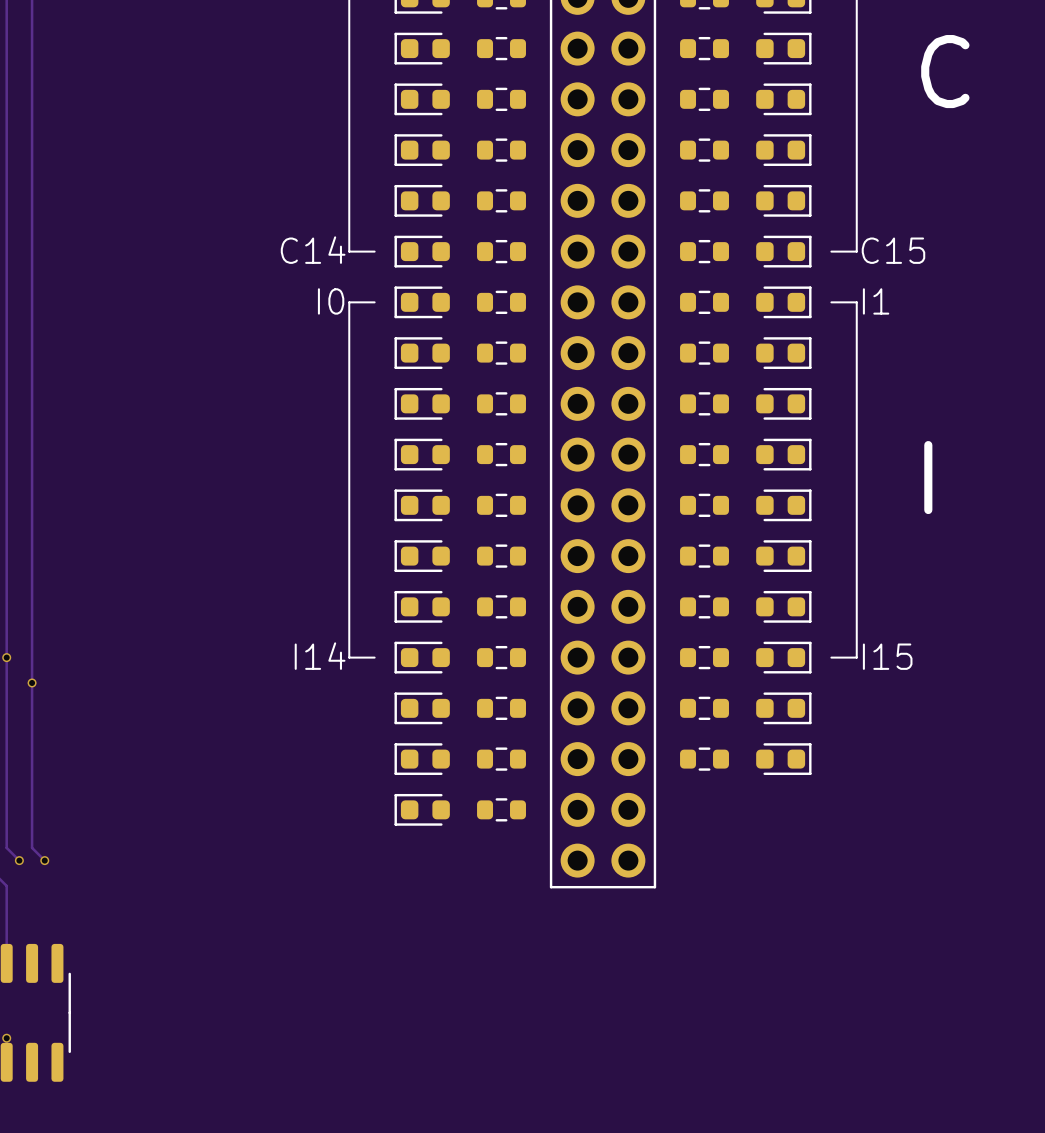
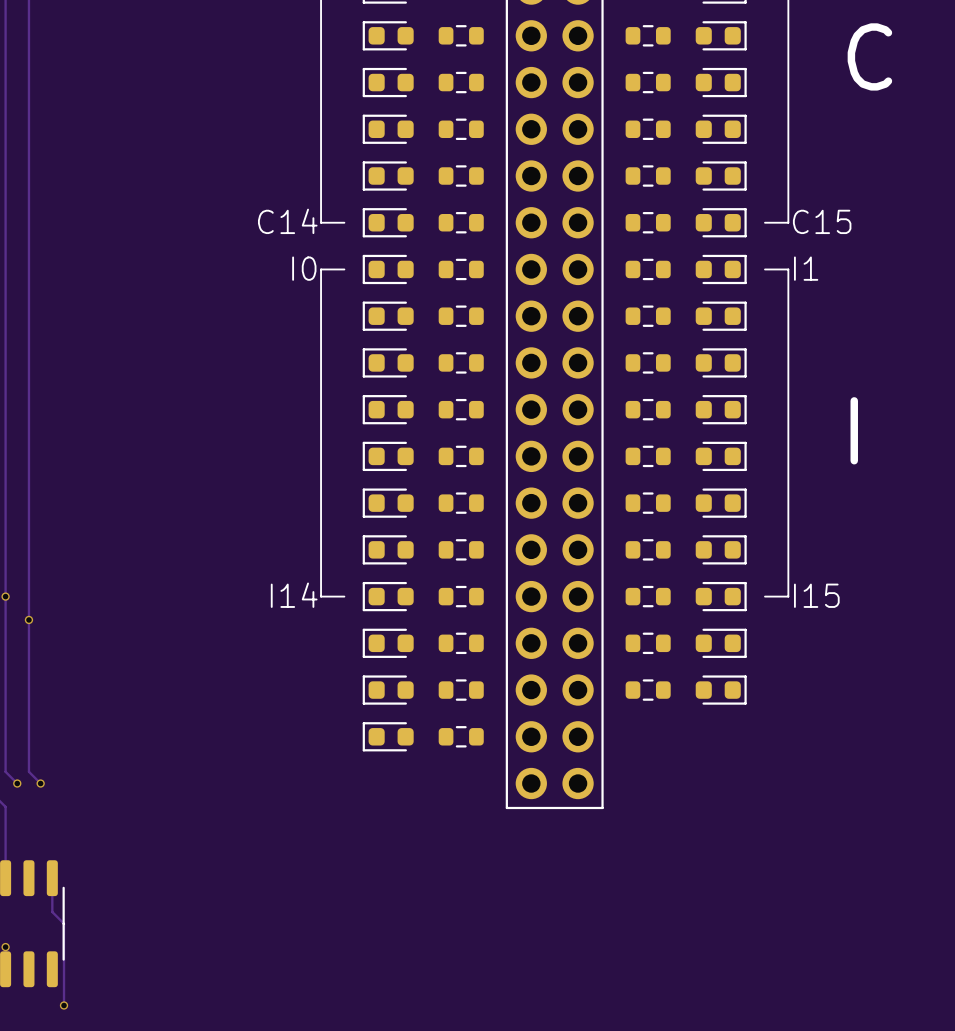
track: none -> (52, 878) (52, 912) (64, 923) (64, 1005)
via: none -> (64, 1005)

